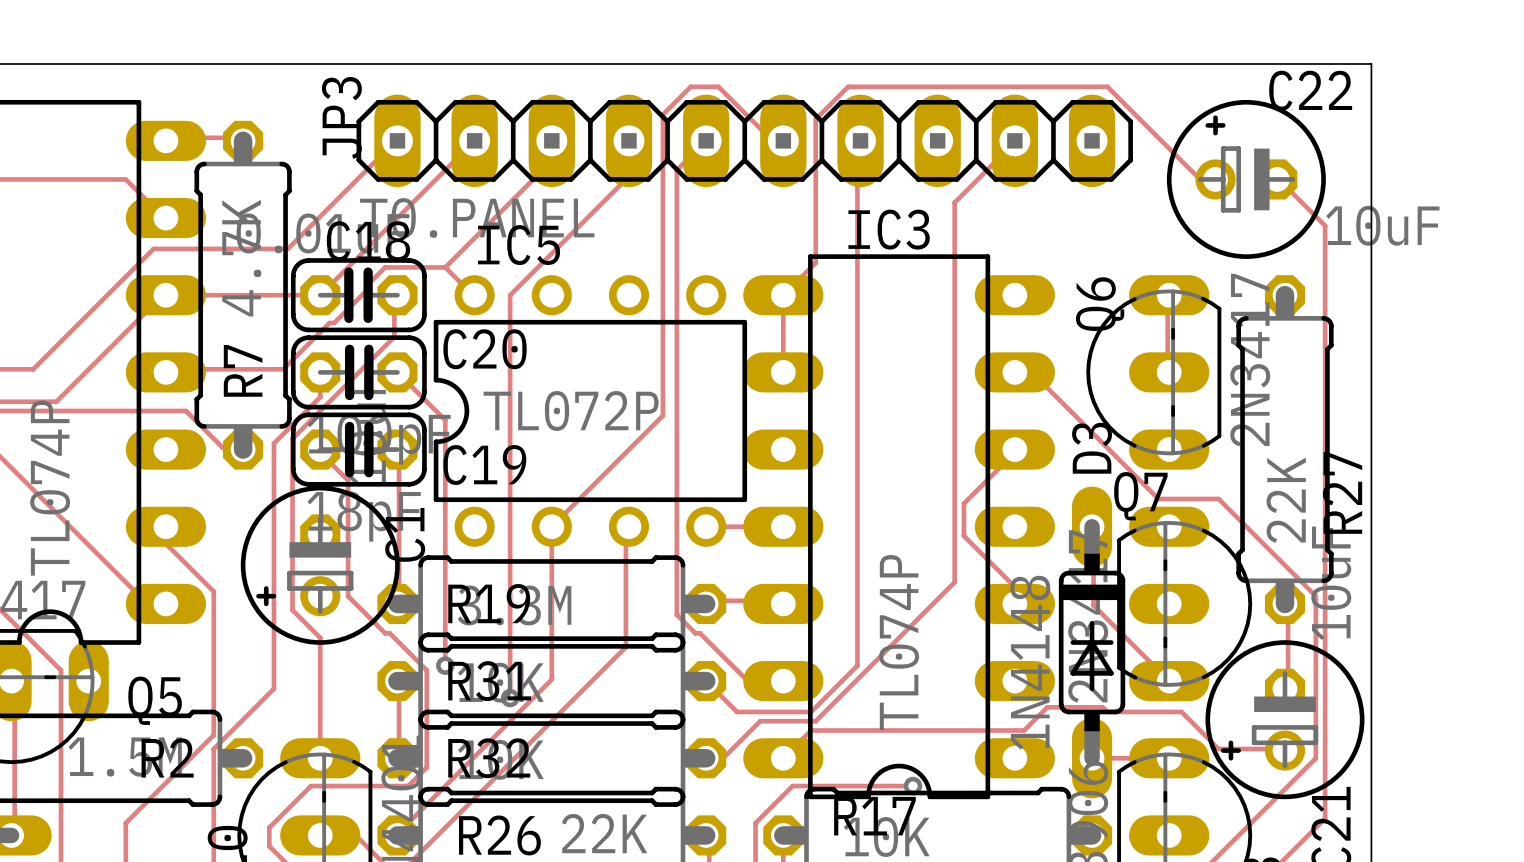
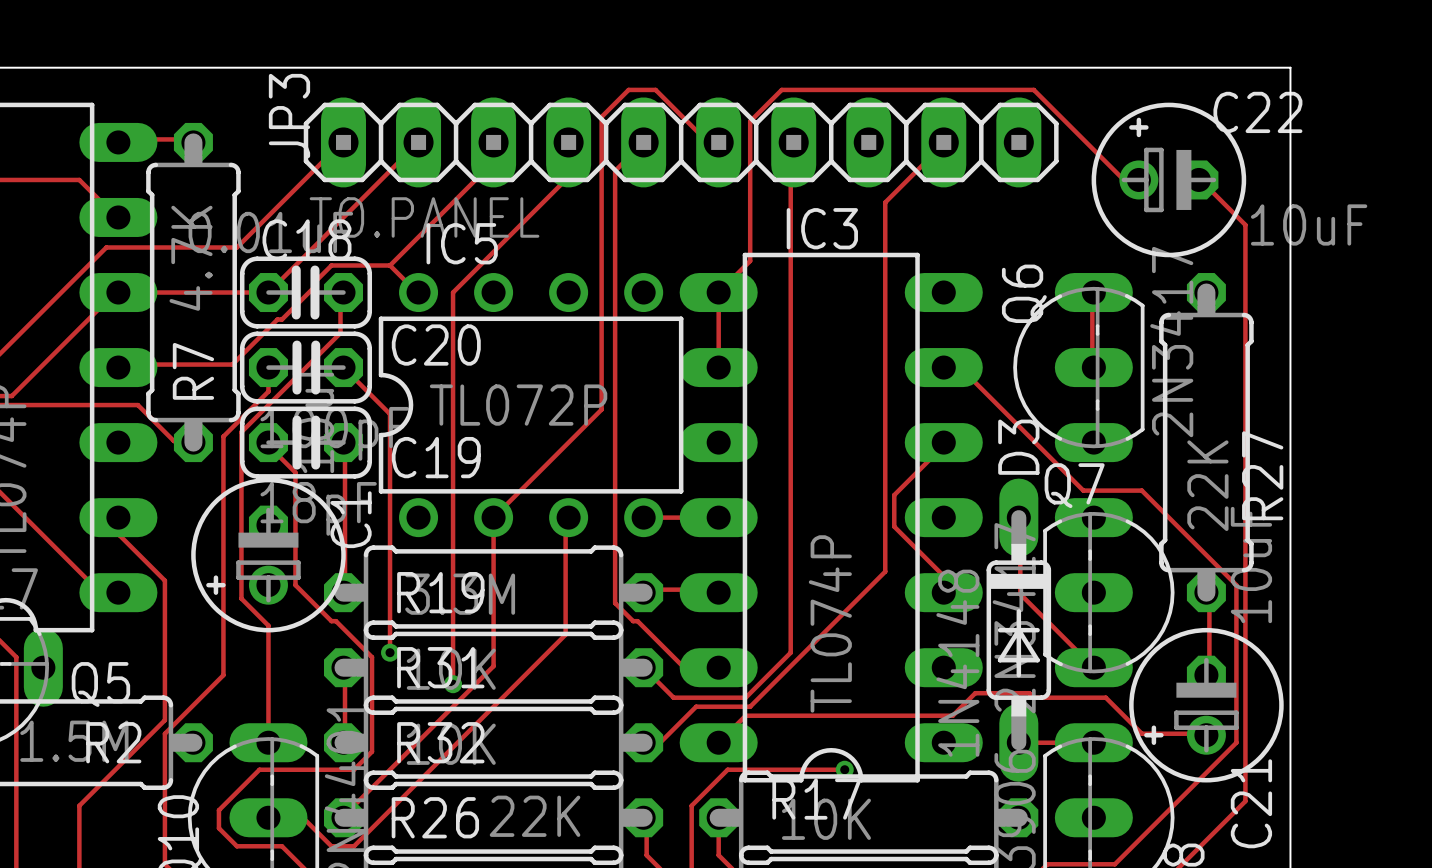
C22 name position: C22 (1310, 90) -> C22 (1257, 112)

